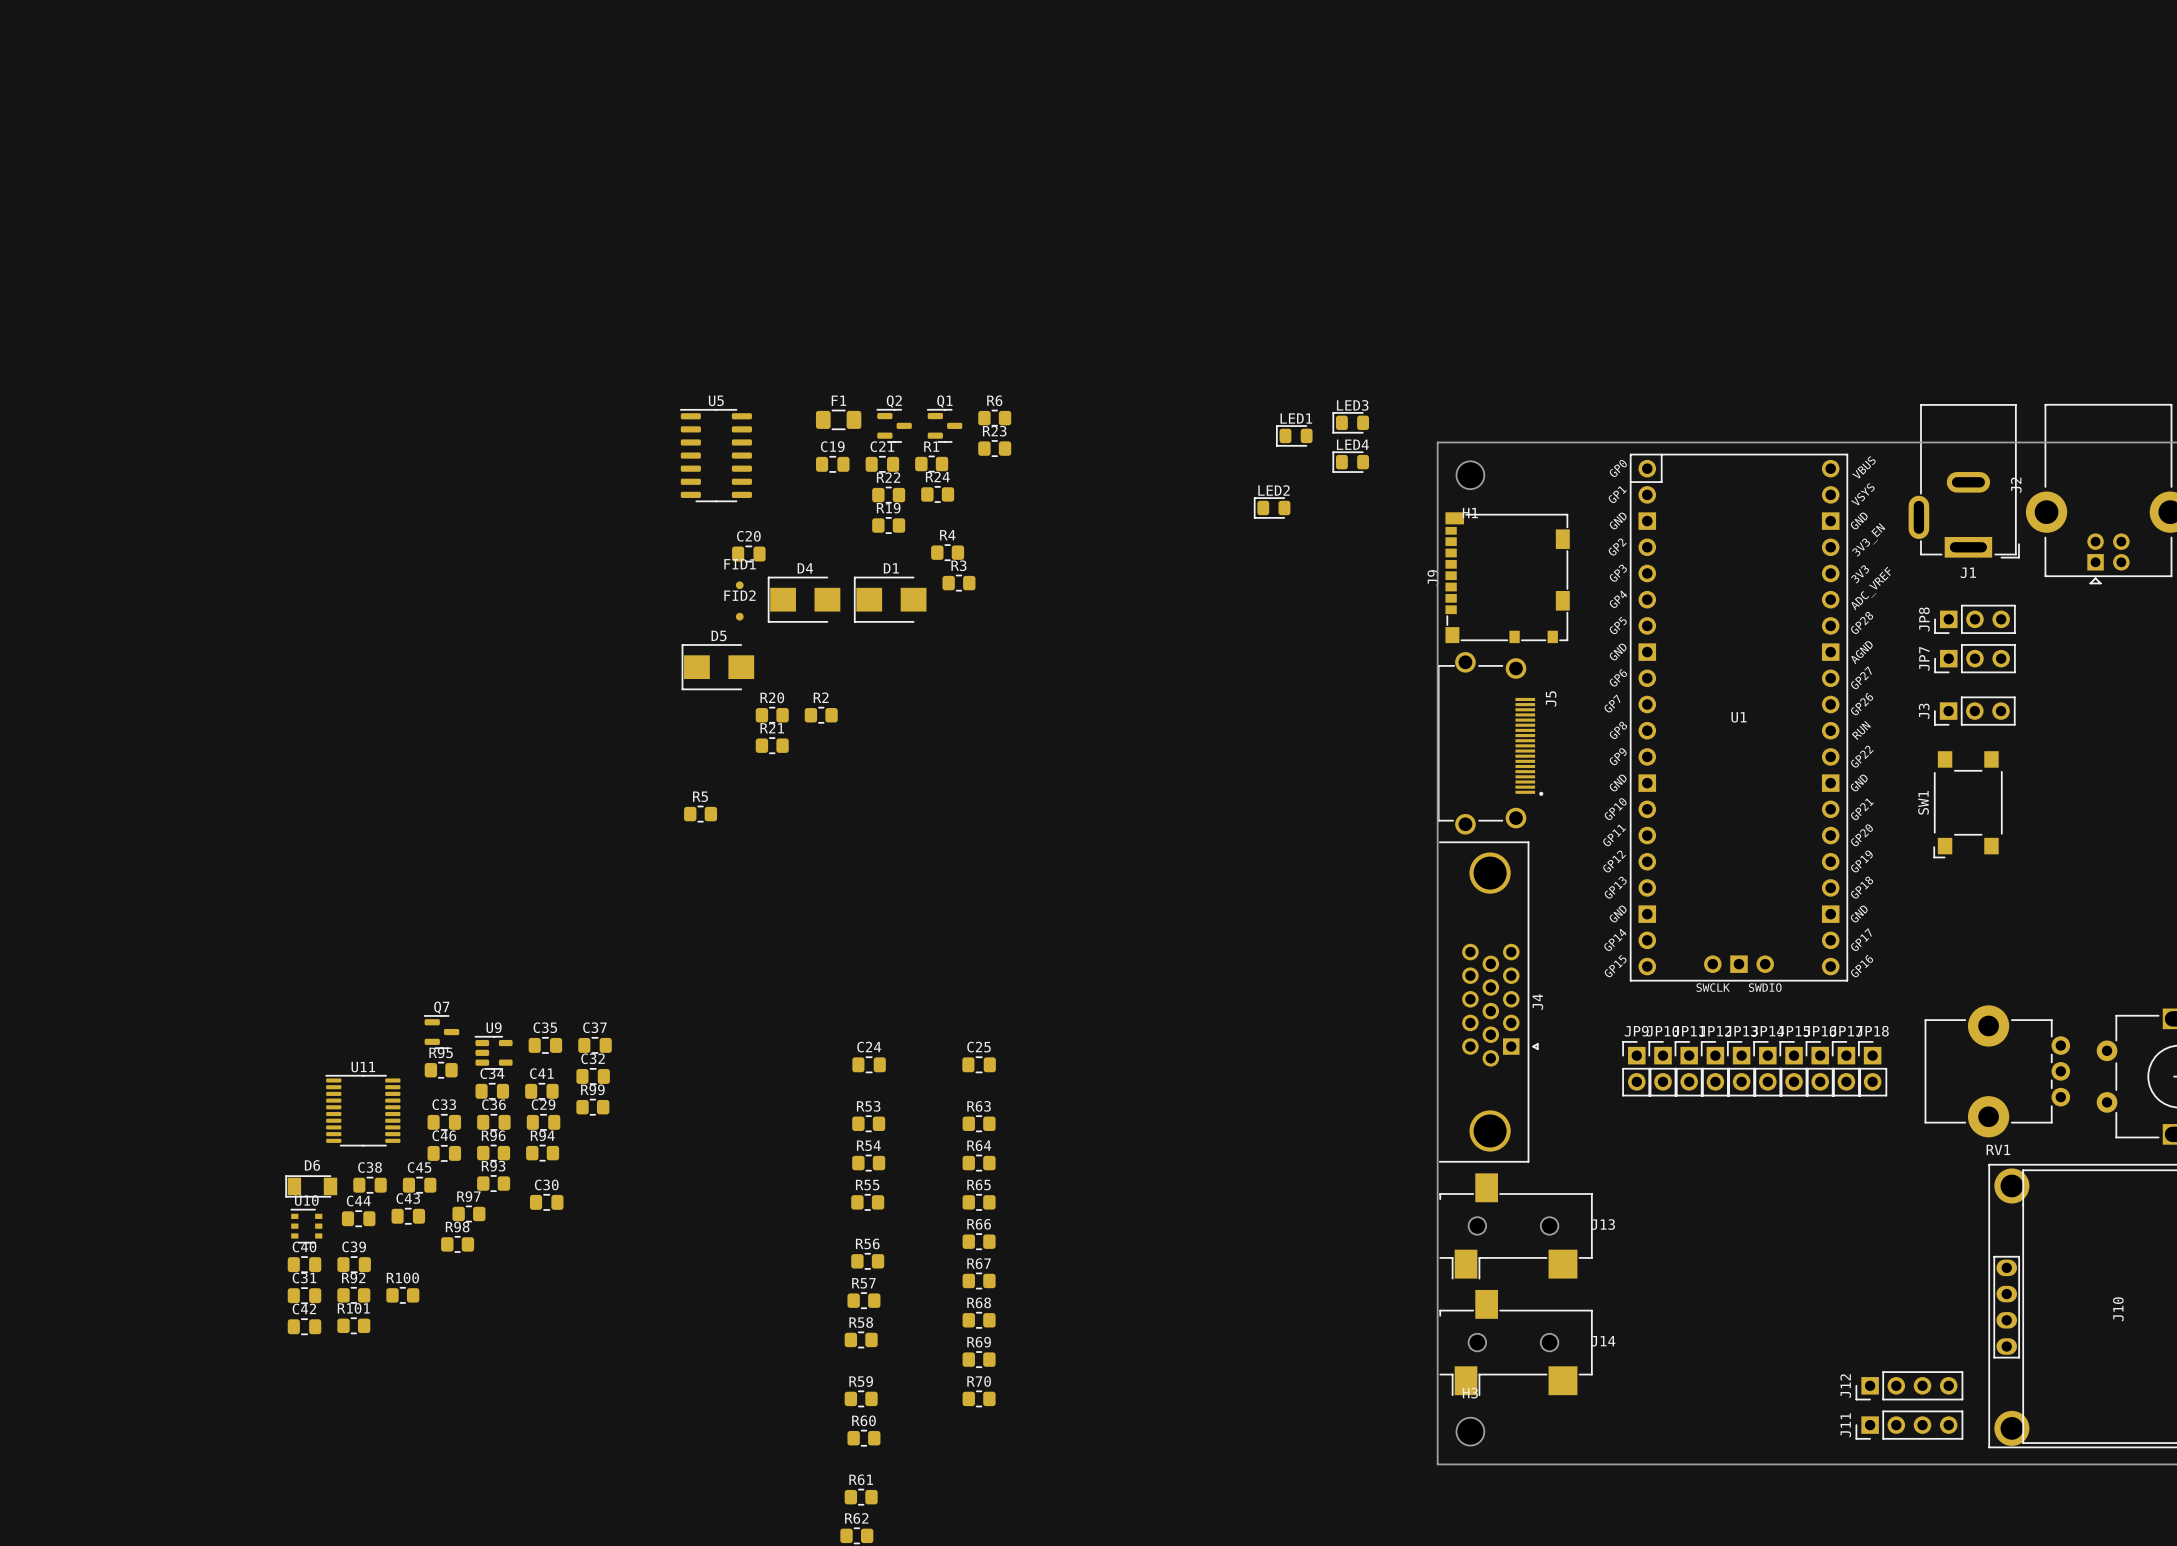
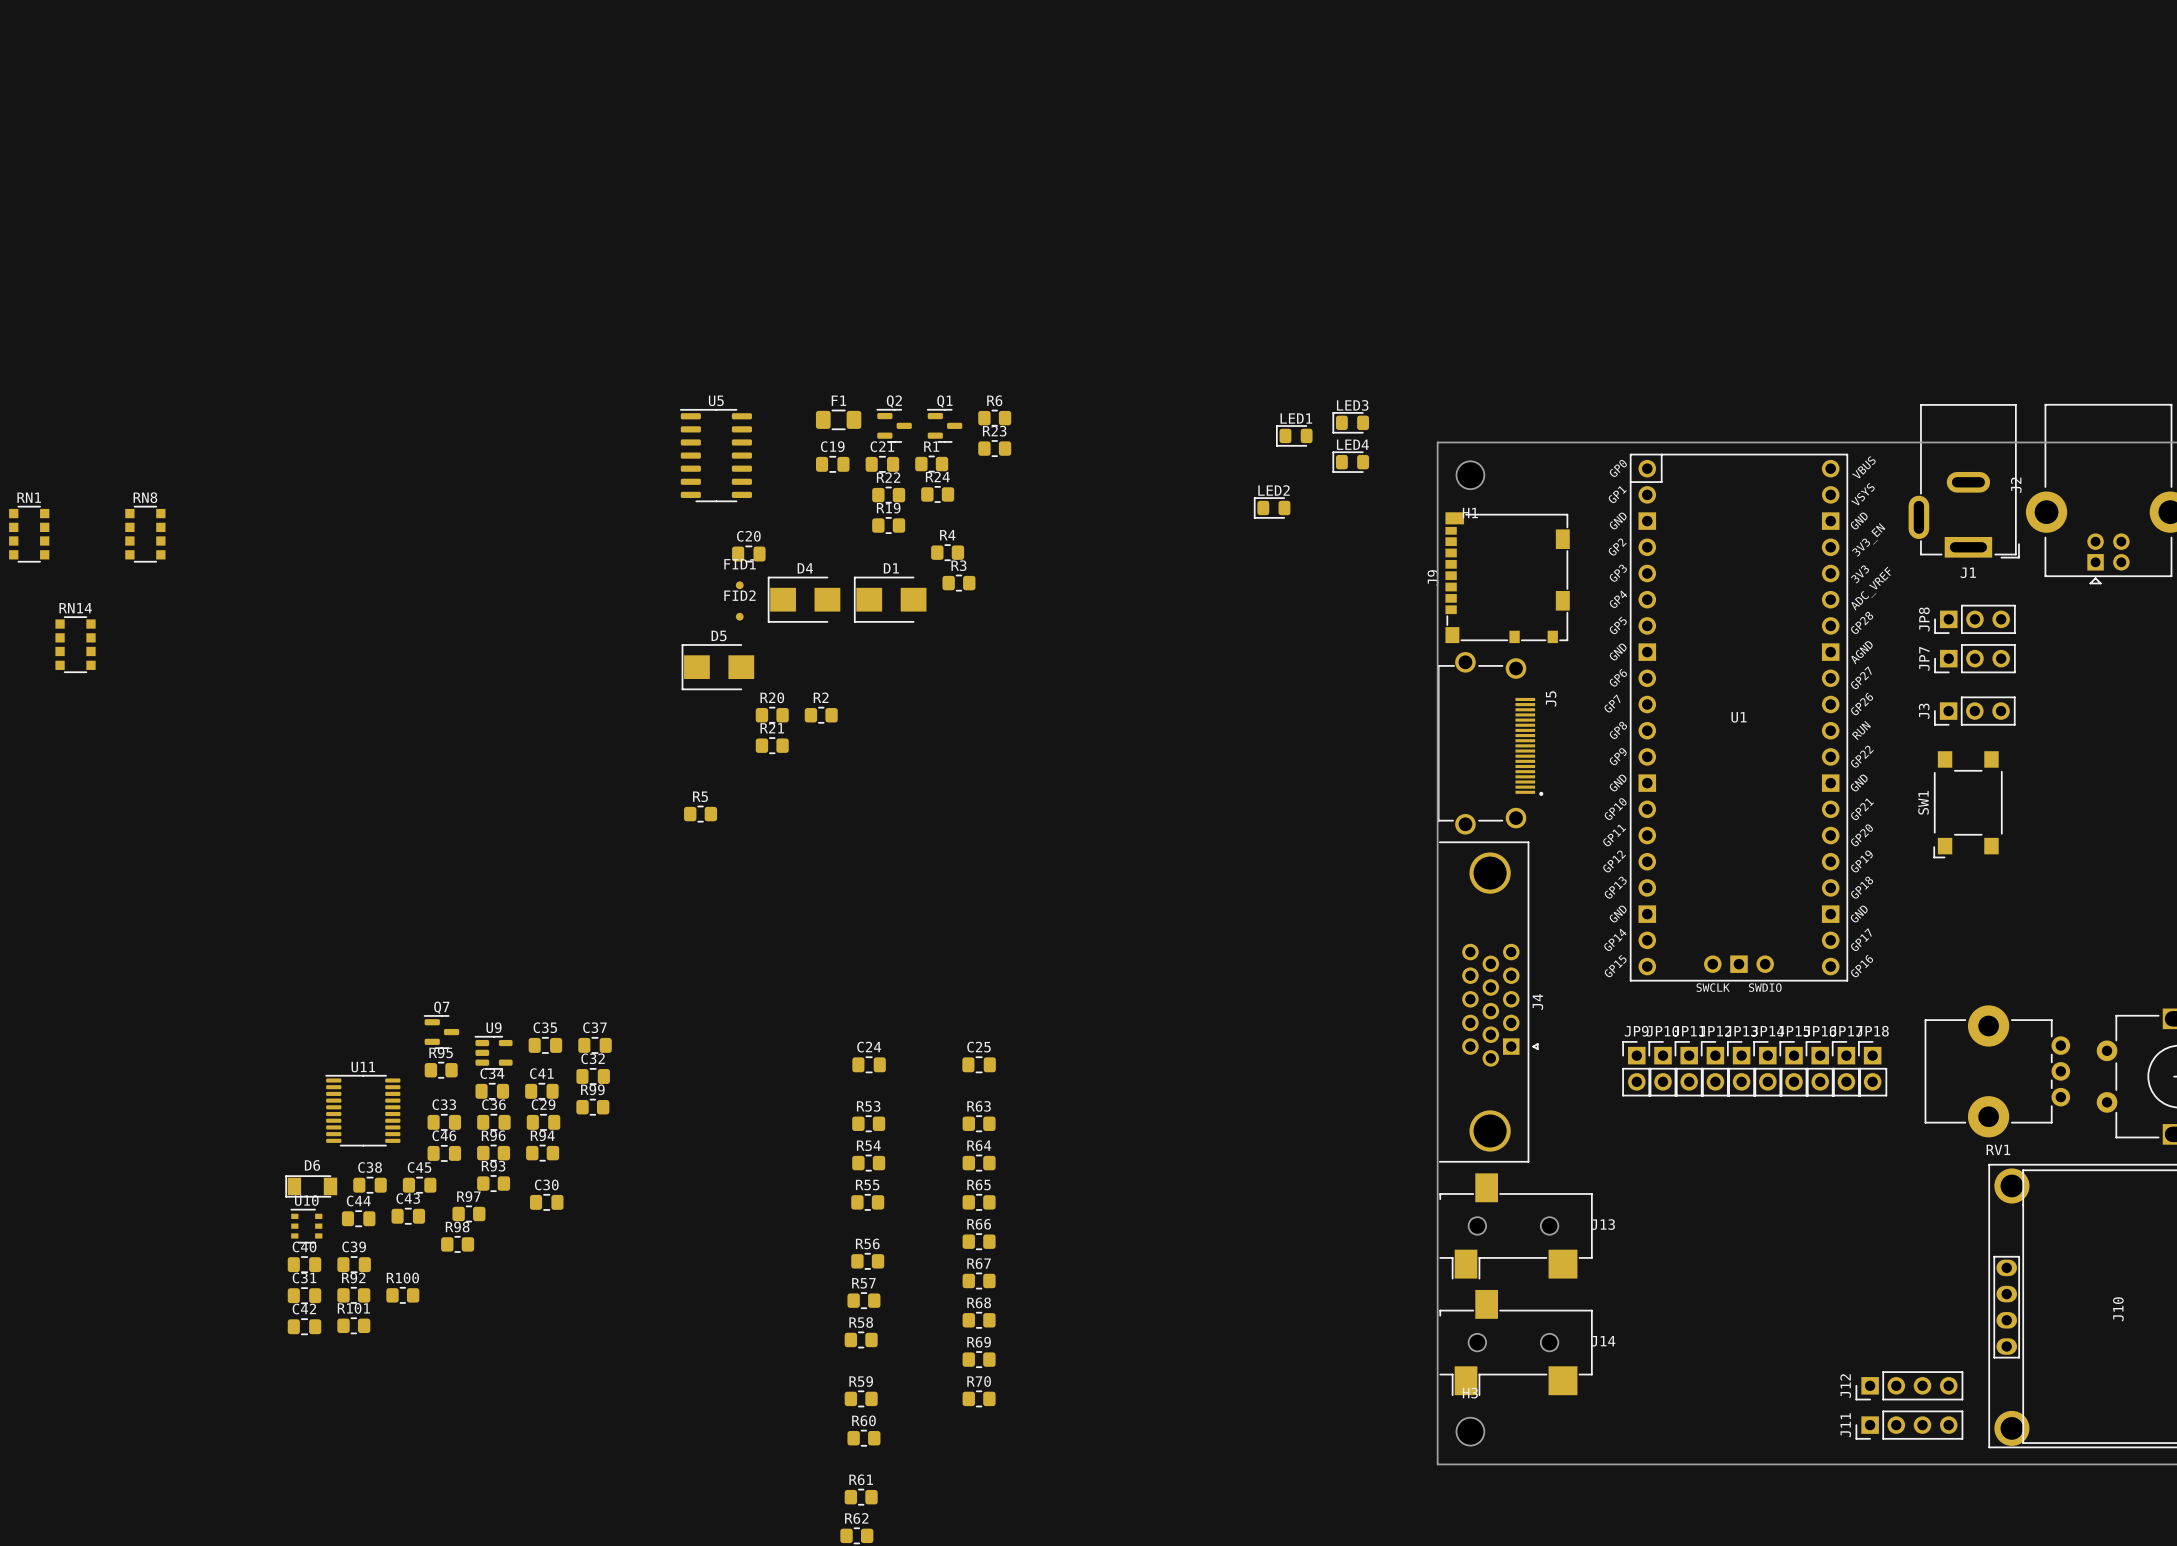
RN1: none -> (29, 534)
RN8: none -> (145, 534)
RN14: none -> (75, 644)

